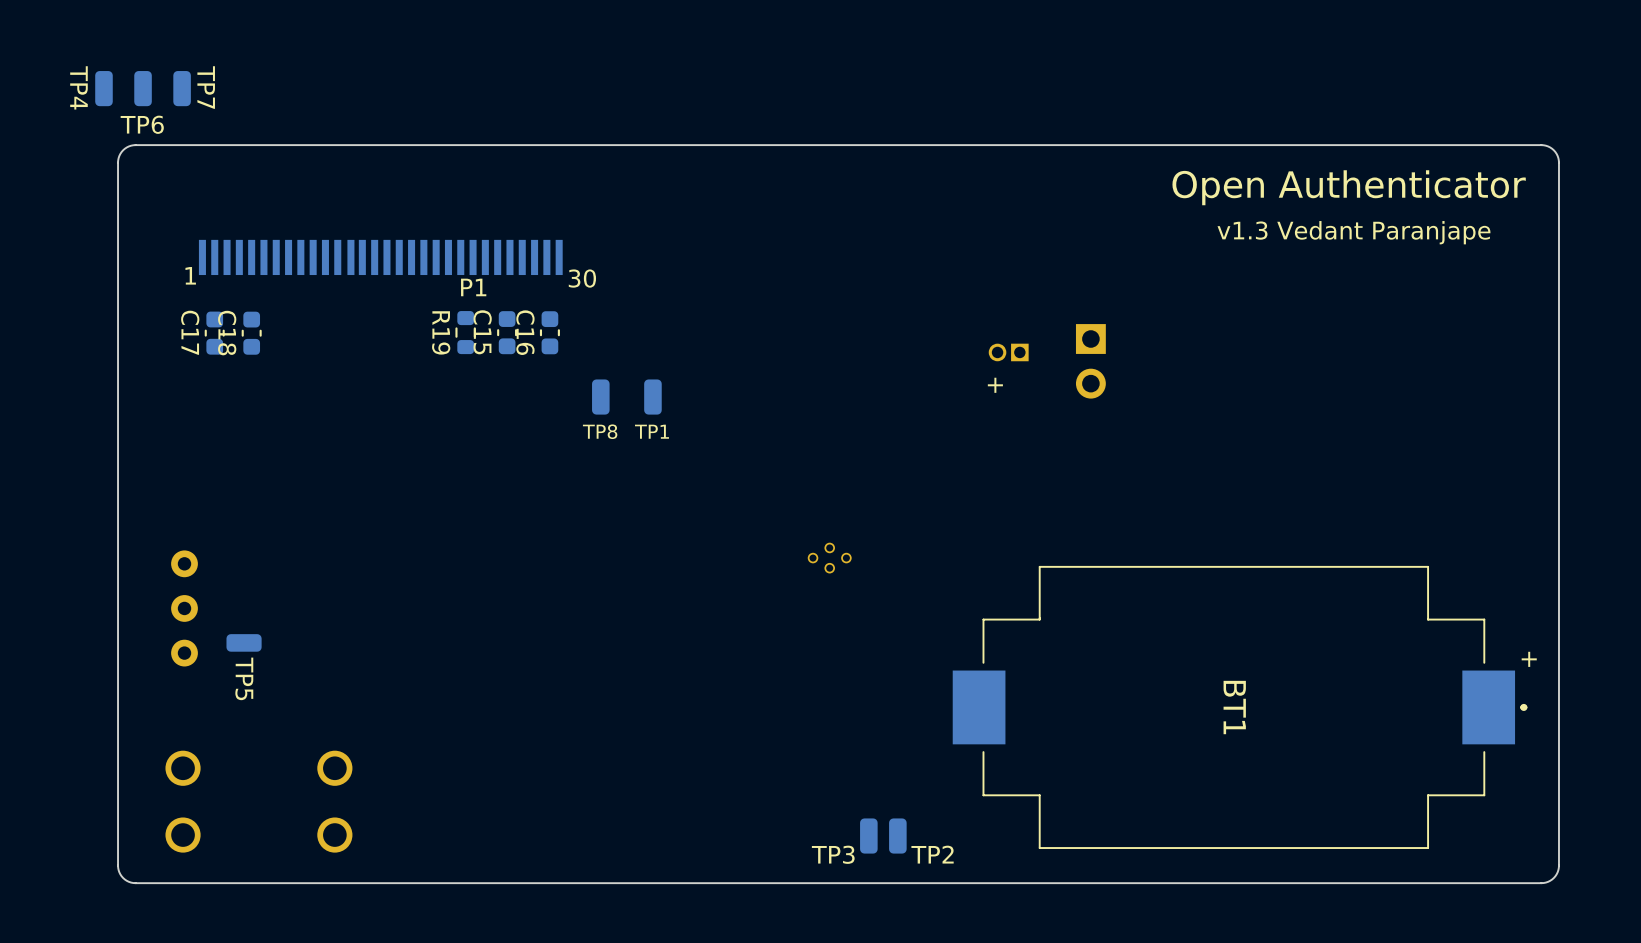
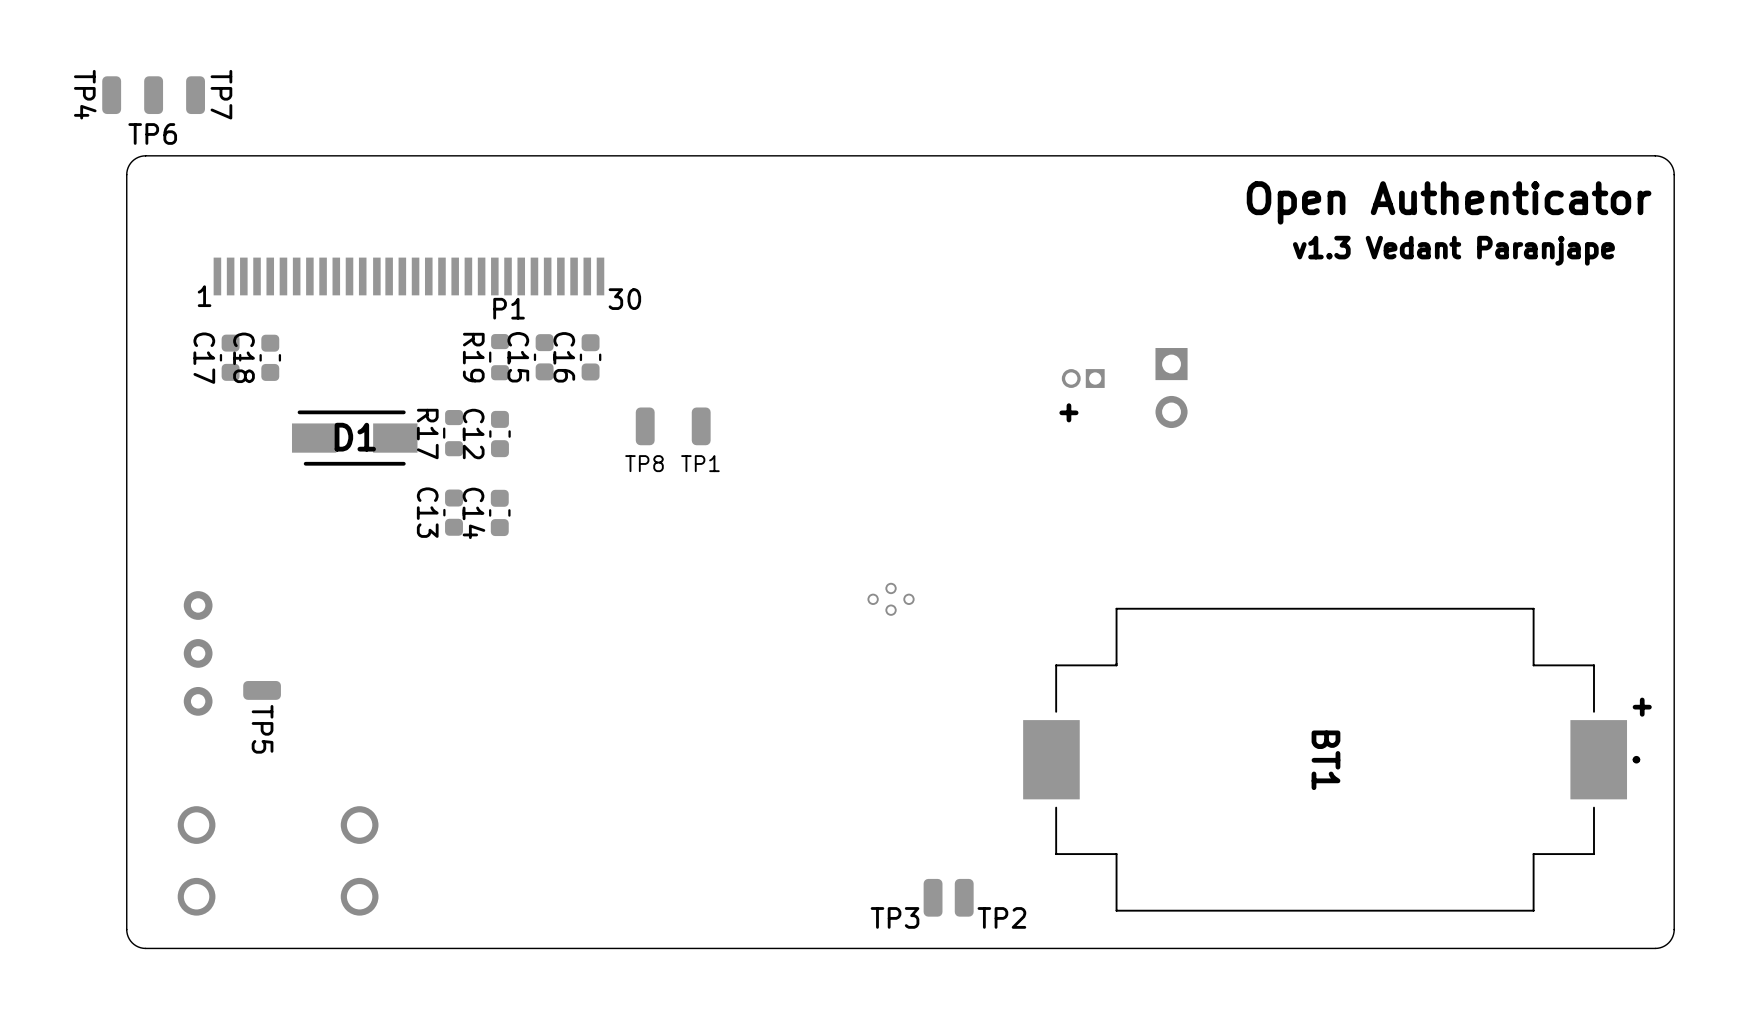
R17: none -> (454, 433)
C12: none -> (499, 434)
D1: none -> (354, 438)
C13: none -> (454, 512)
C14: none -> (499, 512)

